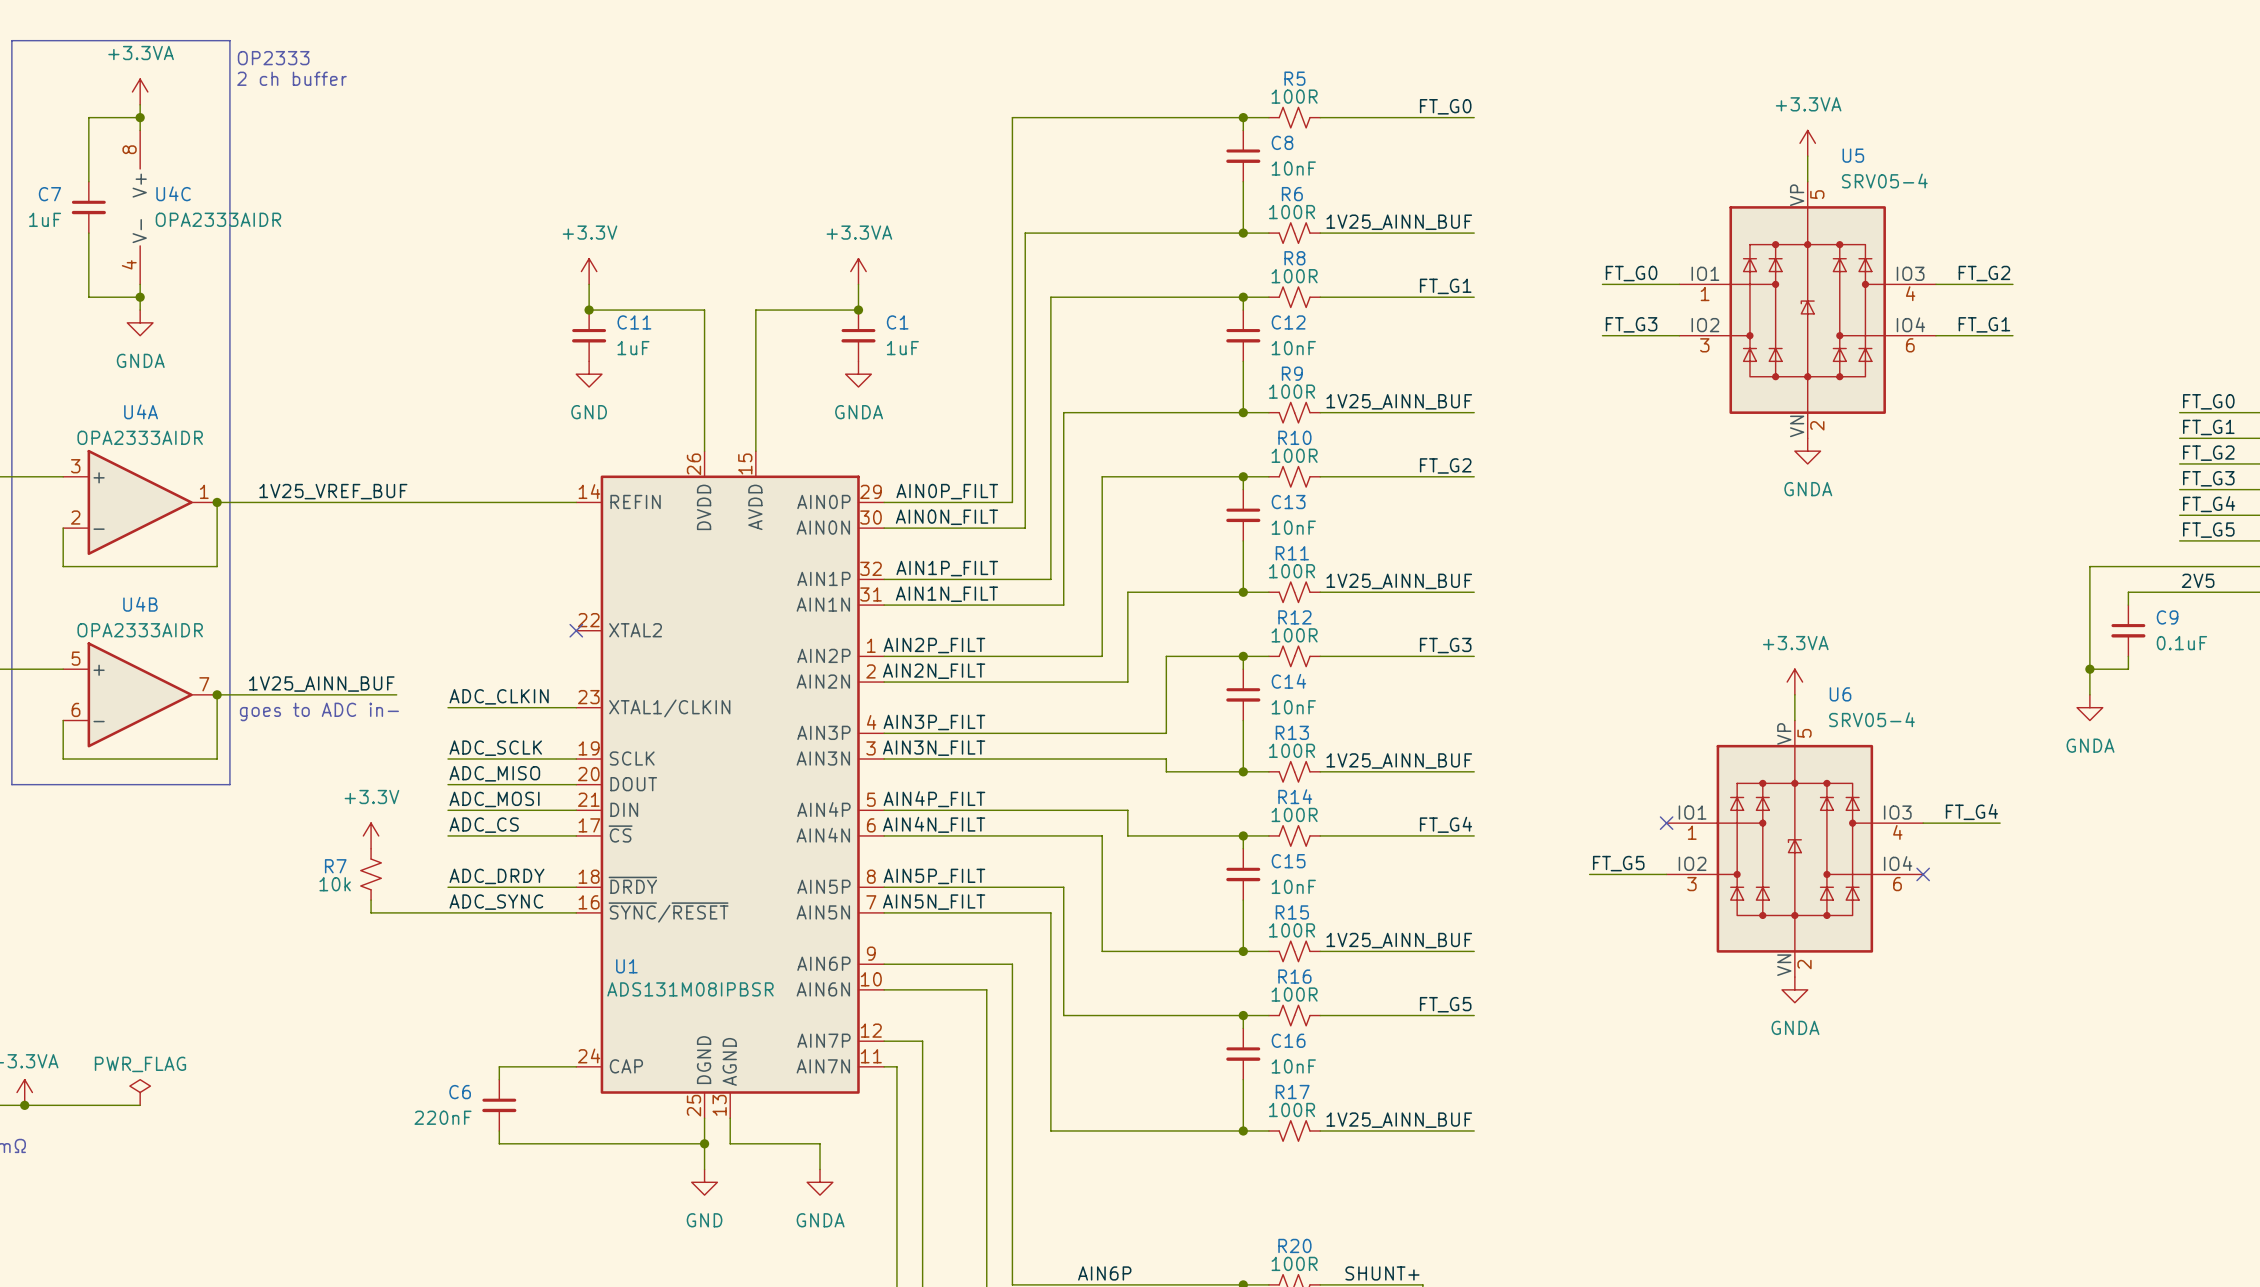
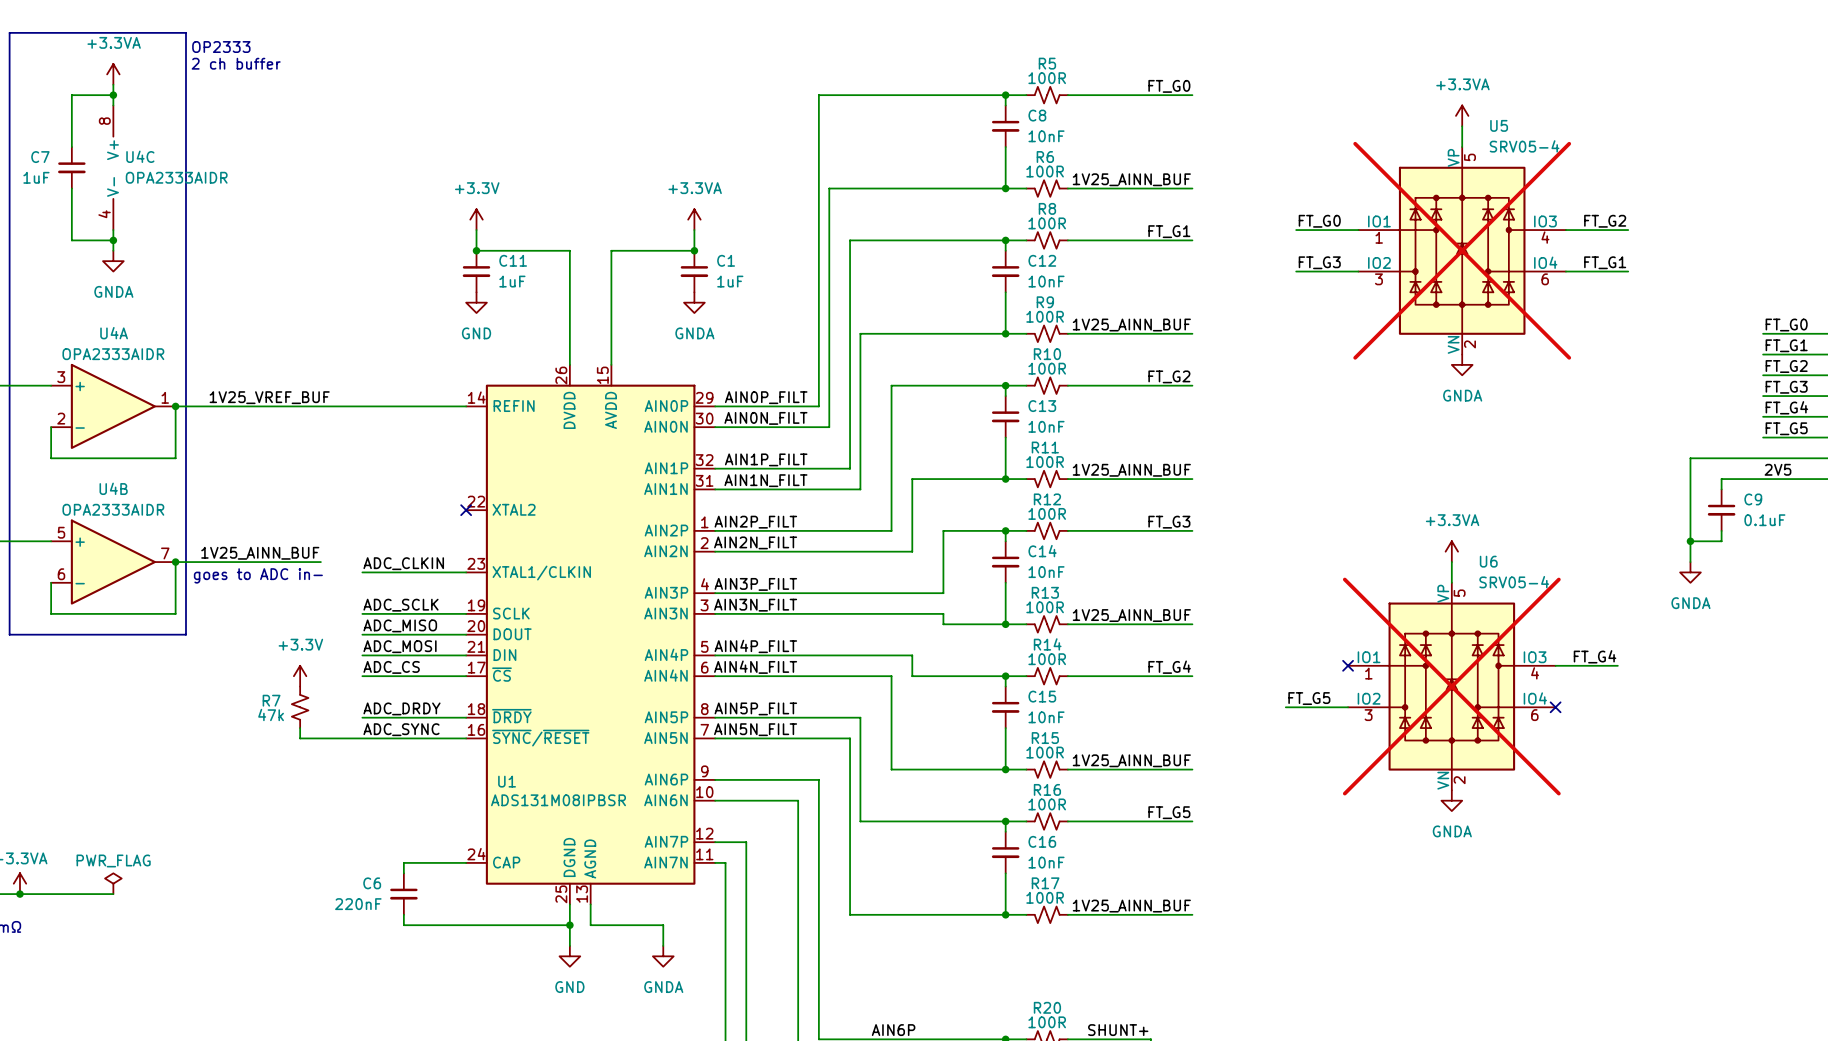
U5 do-not-place cross: none -> (1462, 250)
U6 do-not-place cross: none -> (1451, 686)
R7 value: 10k (335, 884) -> 47k (271, 714)

